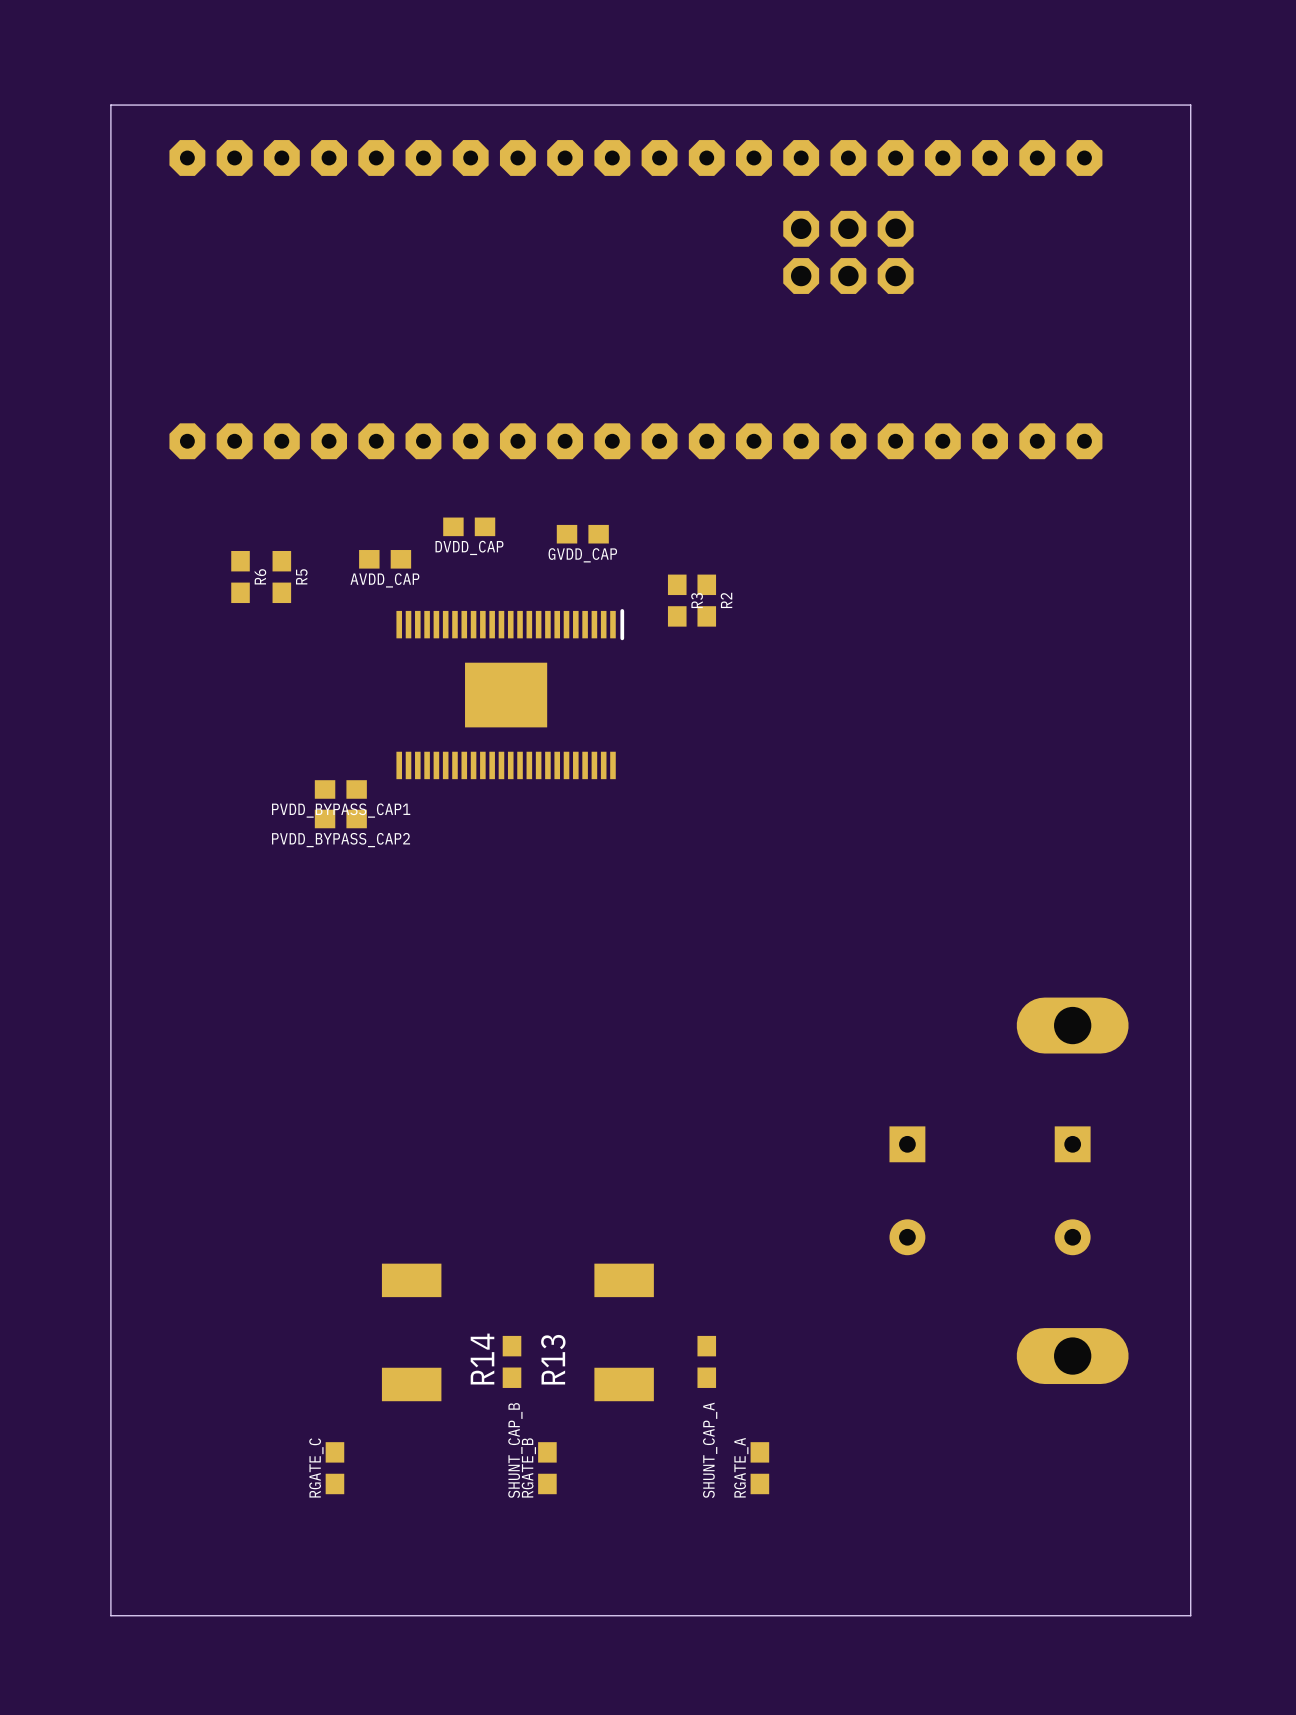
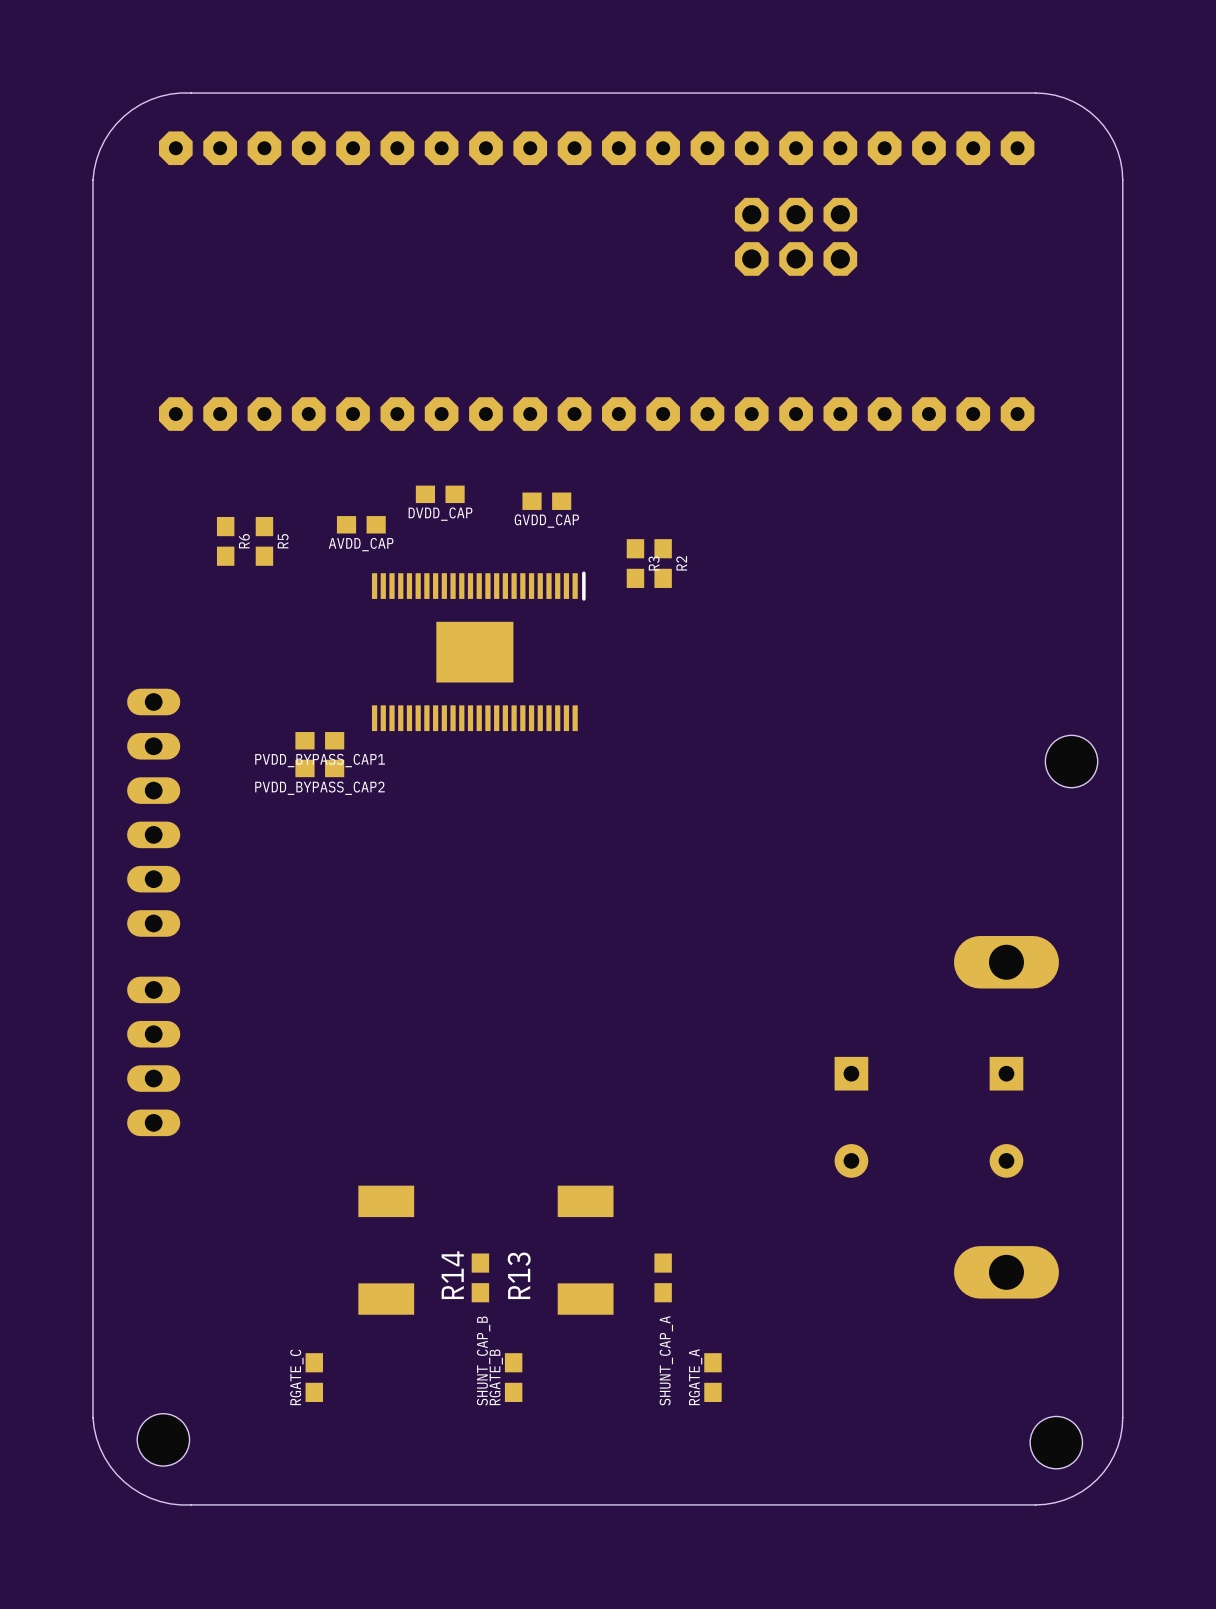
board edge: (1190, 105) (110, 105) (110, 1615) (1190, 1615) (1190, 105) -> (1035, 93) (1064, 97) (1081, 106) (1097, 118) (1109, 133) (1117, 151) (1122, 180) (1122, 1417) (1117, 1446) (1109, 1464) (1097, 1479) (1081, 1491) (1064, 1500) (1035, 1504) (180, 1504) (160, 1501) (132, 1488) (116, 1474) (104, 1457) (96, 1438) (92, 1417) (92, 180) (96, 159) (110, 131) (124, 116) (141, 104) (160, 96) (180, 92) (1035, 93)
hole: none -> (1071, 761)
part: none -> (153, 812)
part: none -> (153, 1056)
hole: none -> (163, 1439)
hole: none -> (1056, 1442)

